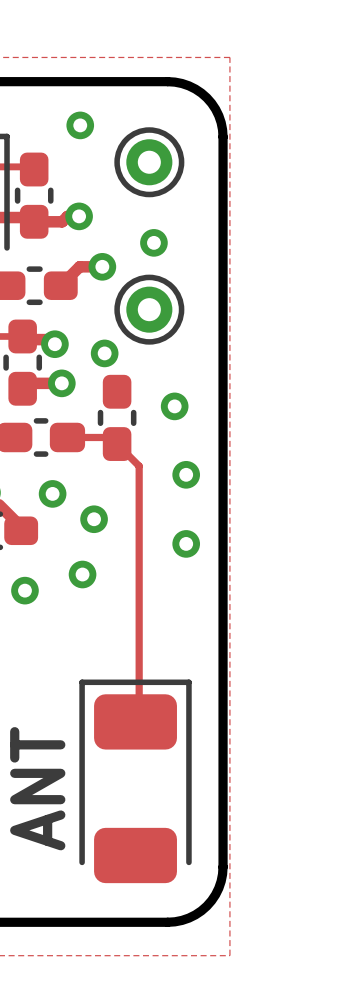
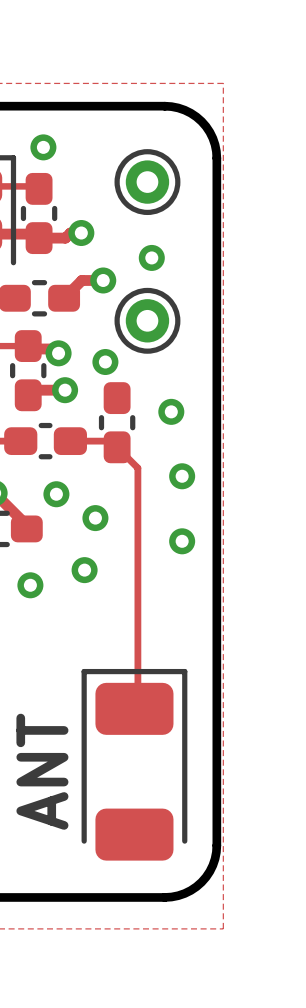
via position: (80, 125) -> (43, 147)

